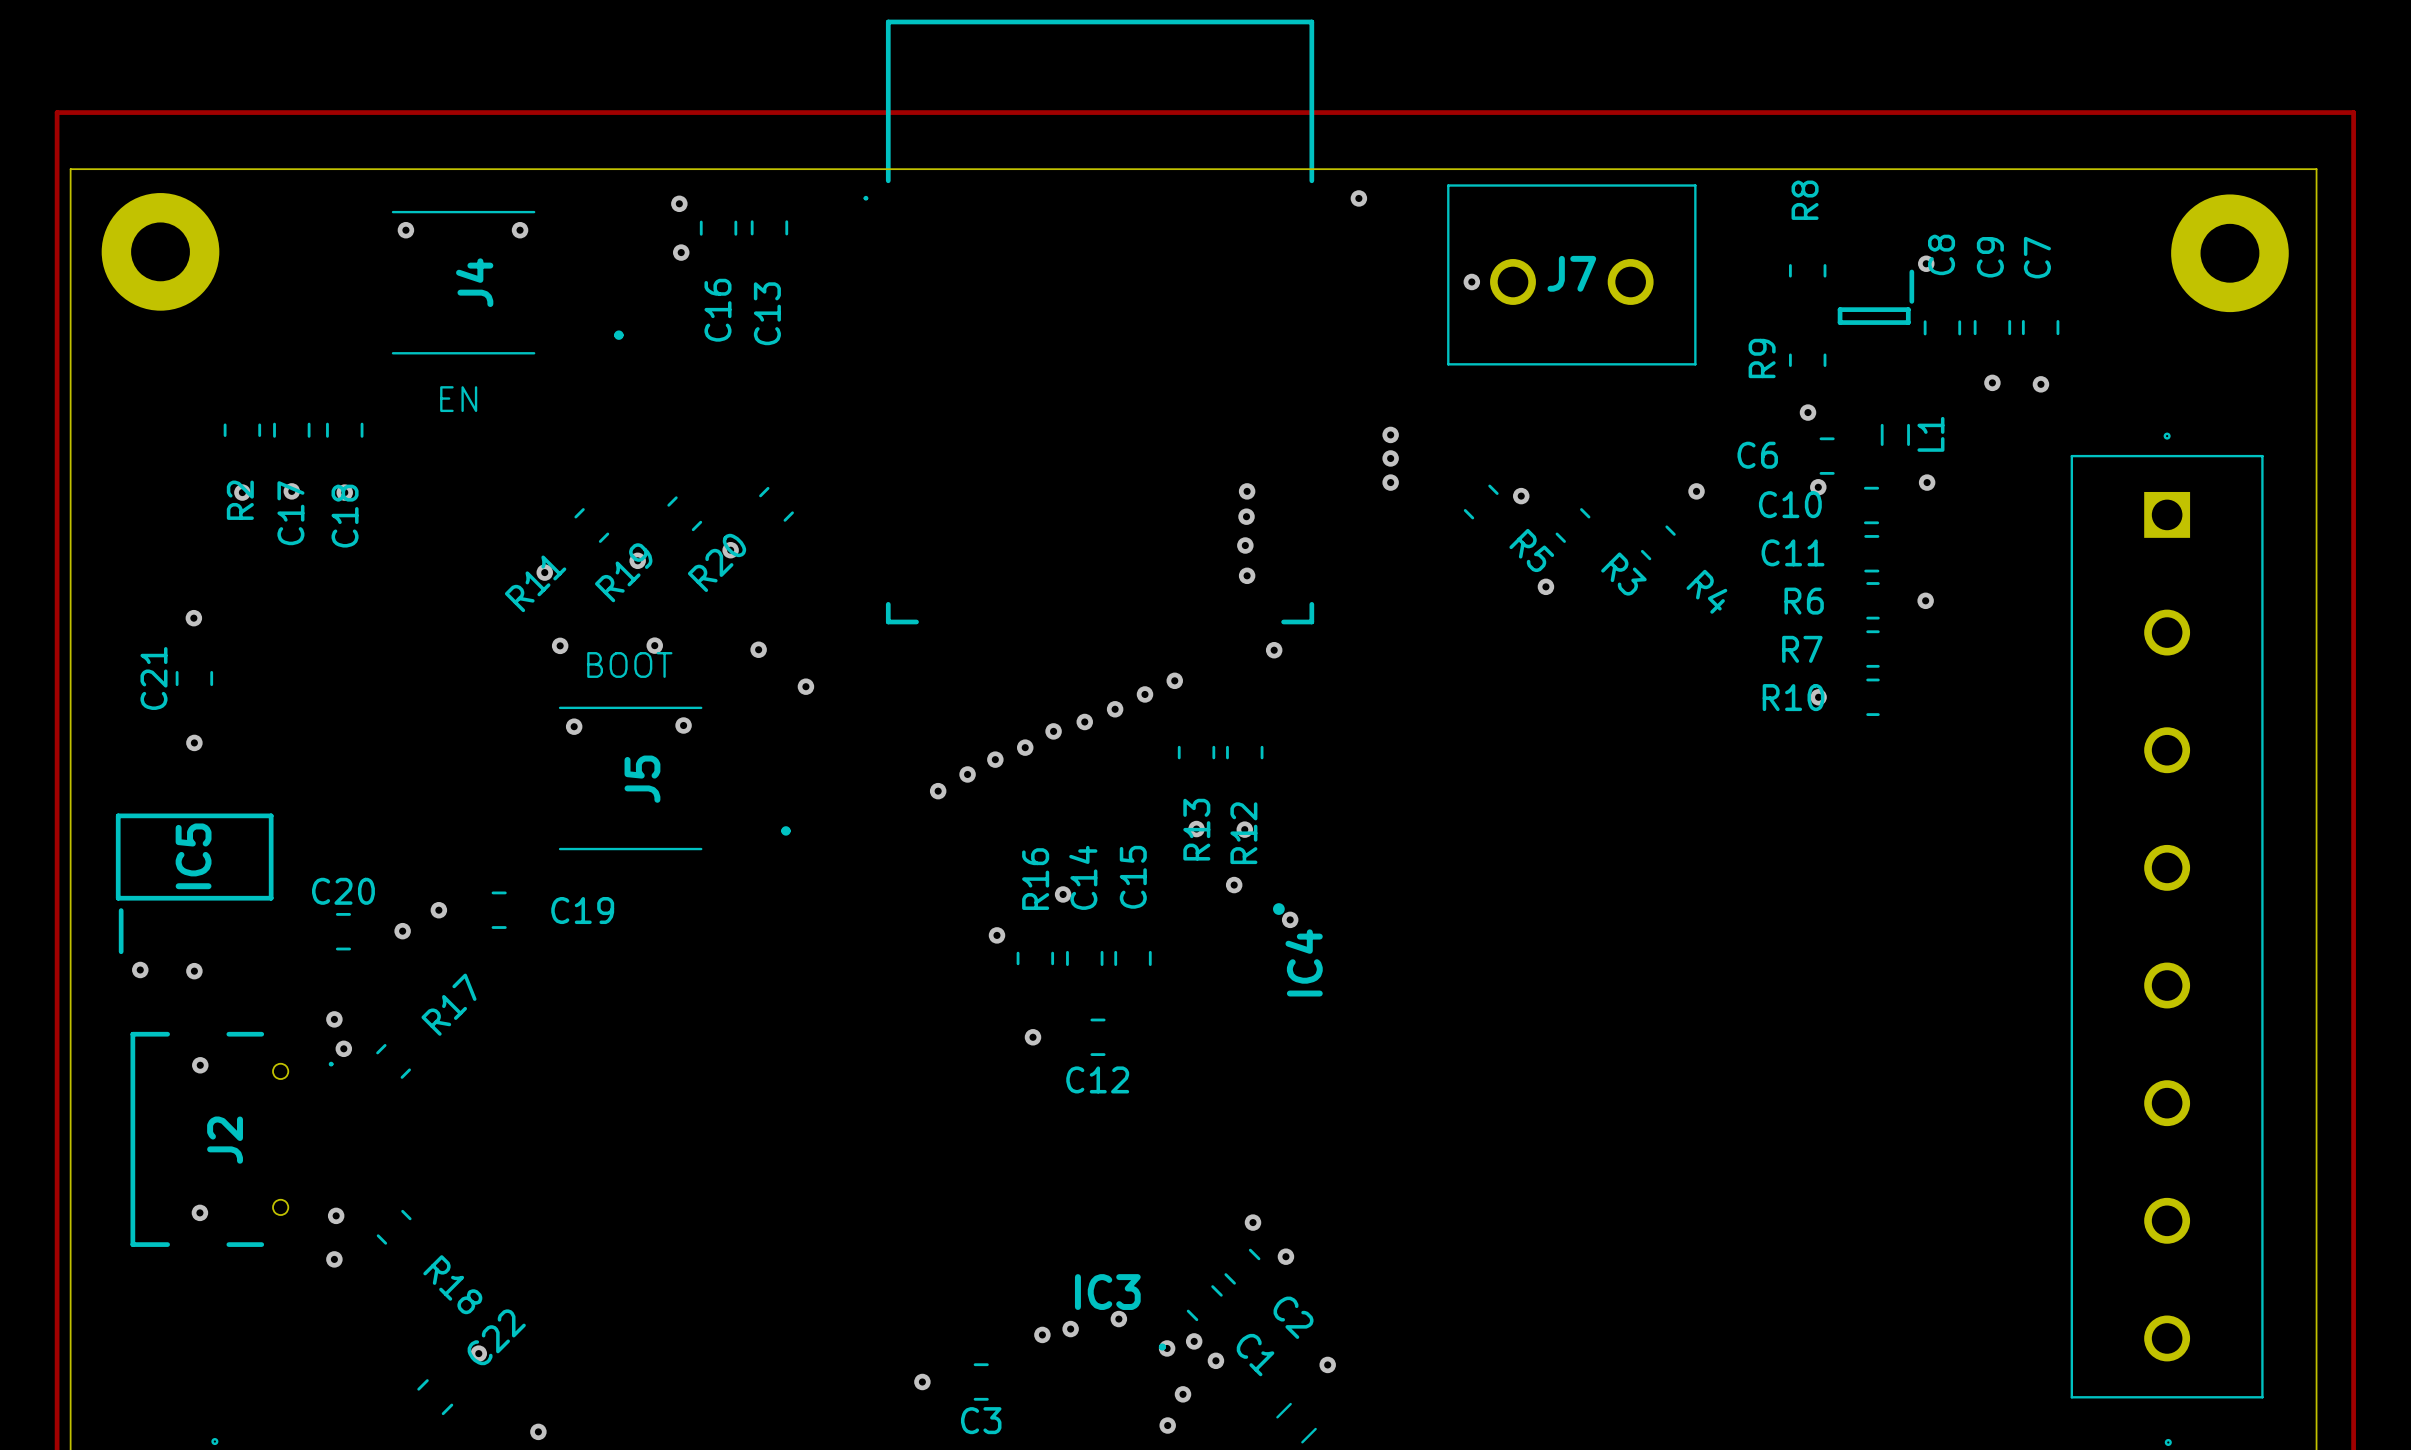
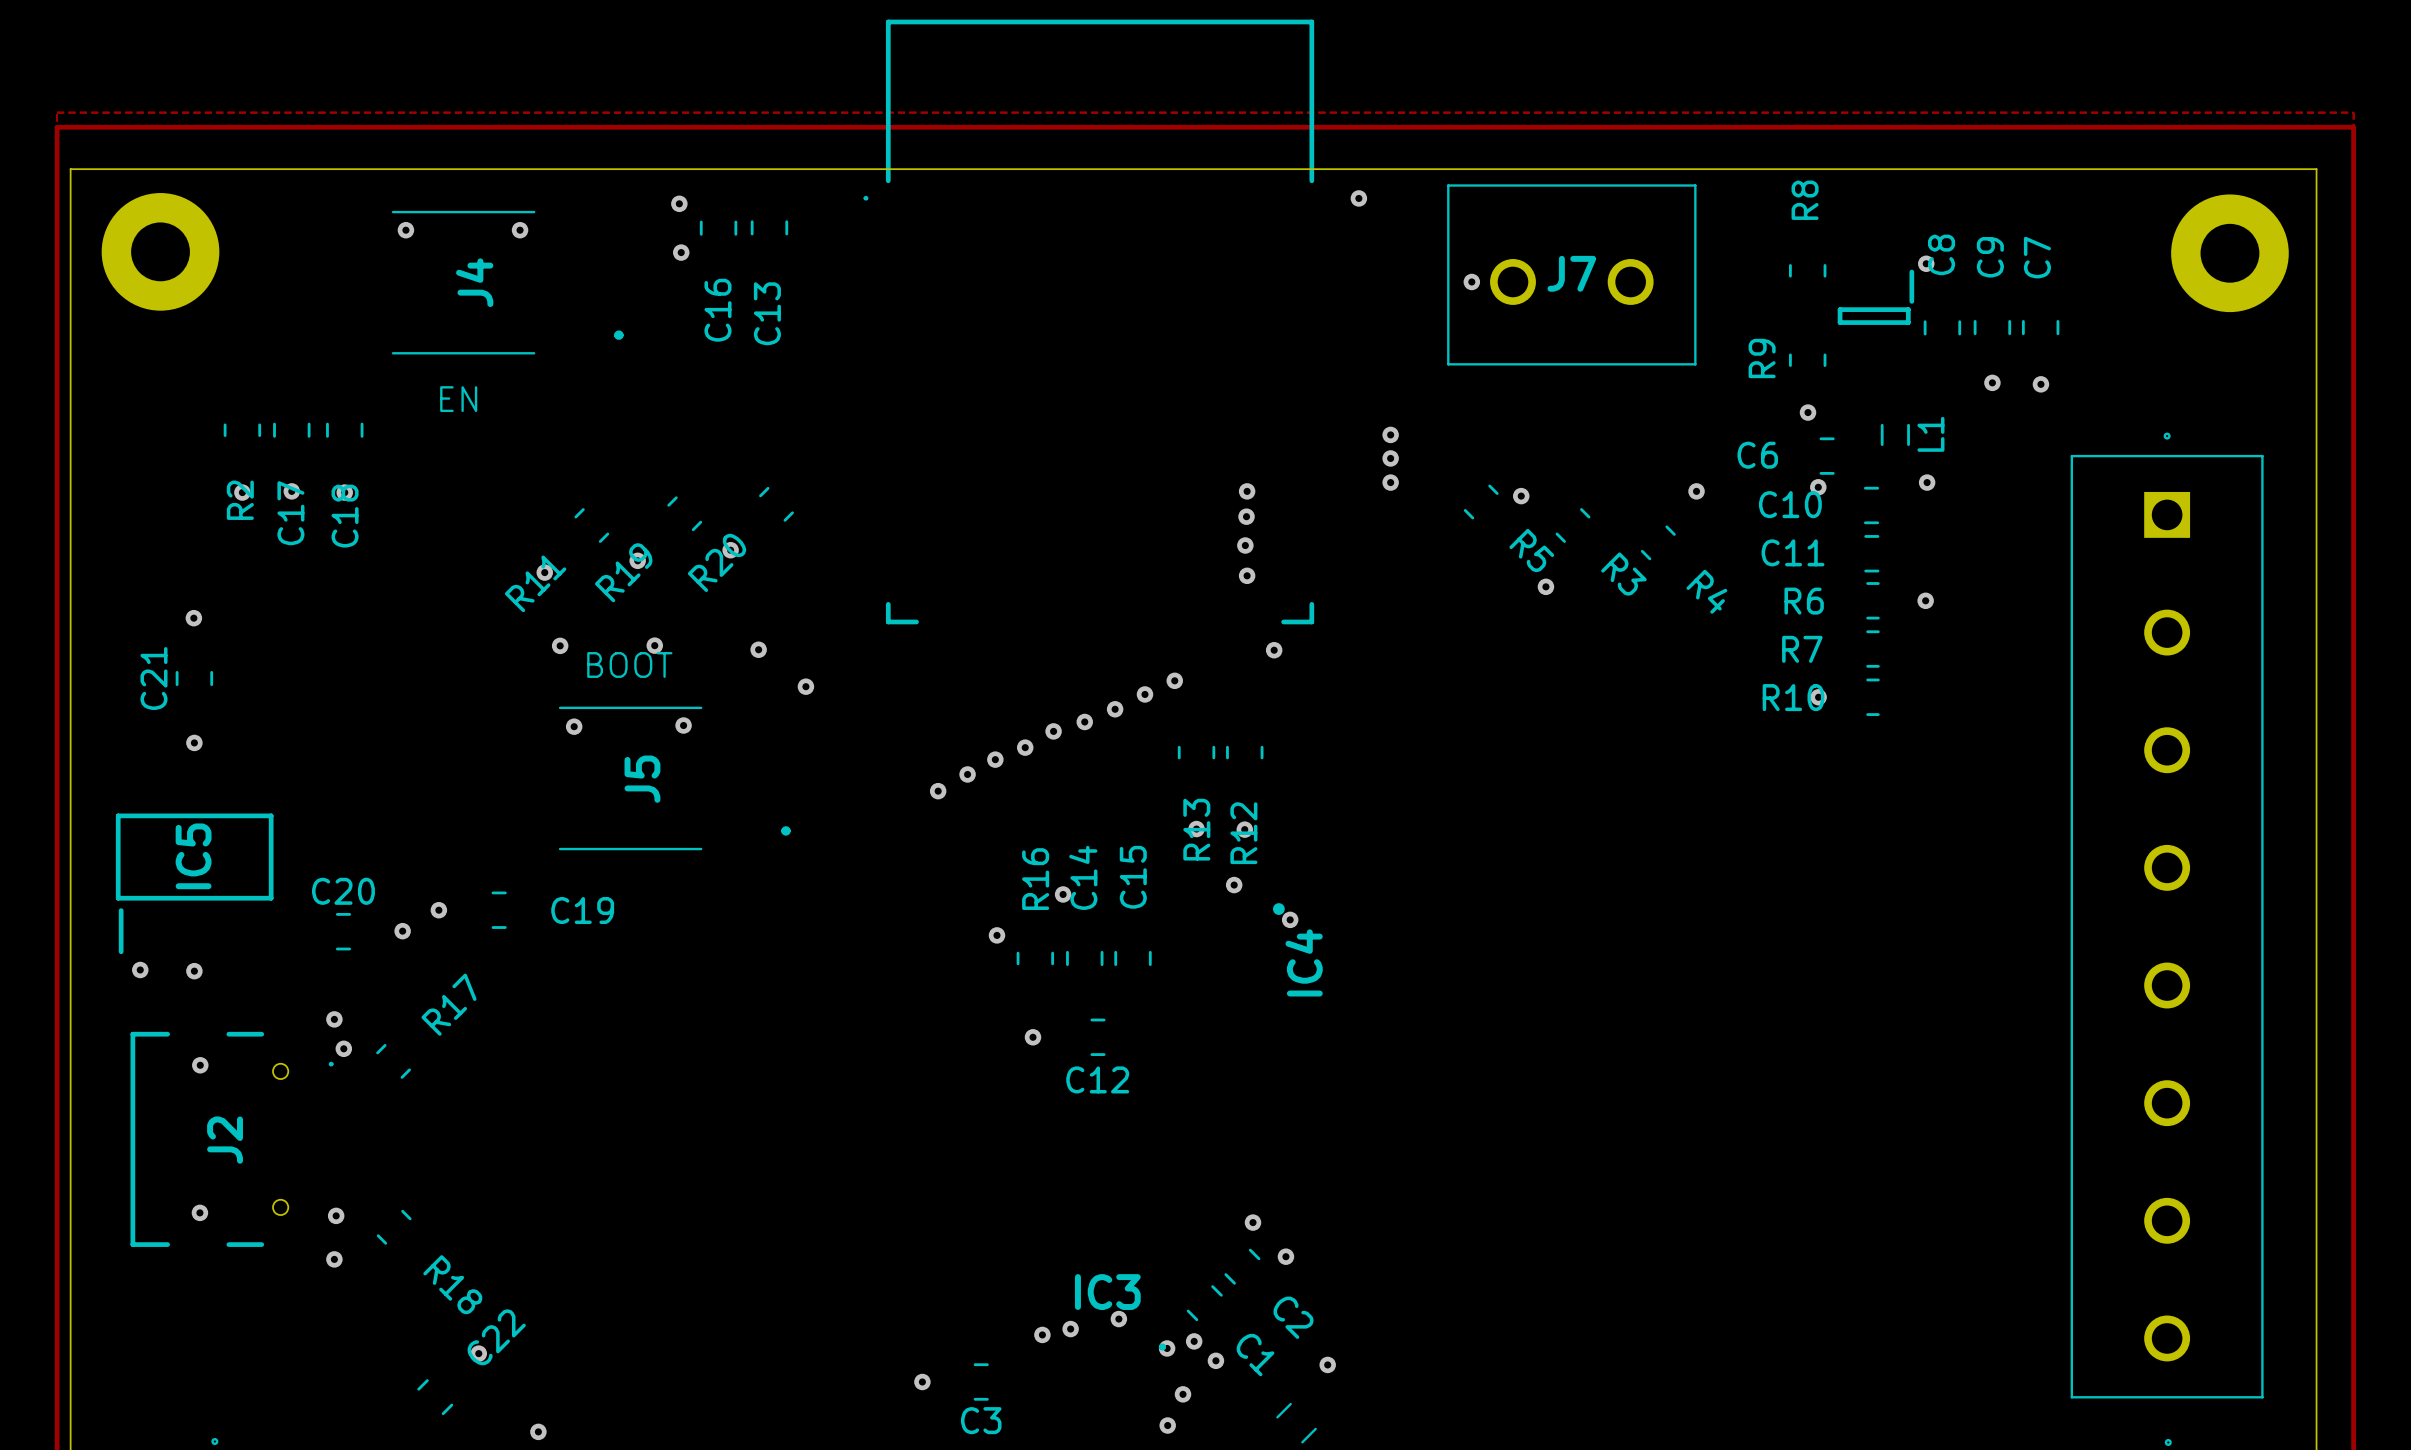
track: (57, 127) (57, 112) (2353, 112) (2353, 127) -> (57, 127) (2353, 127)

